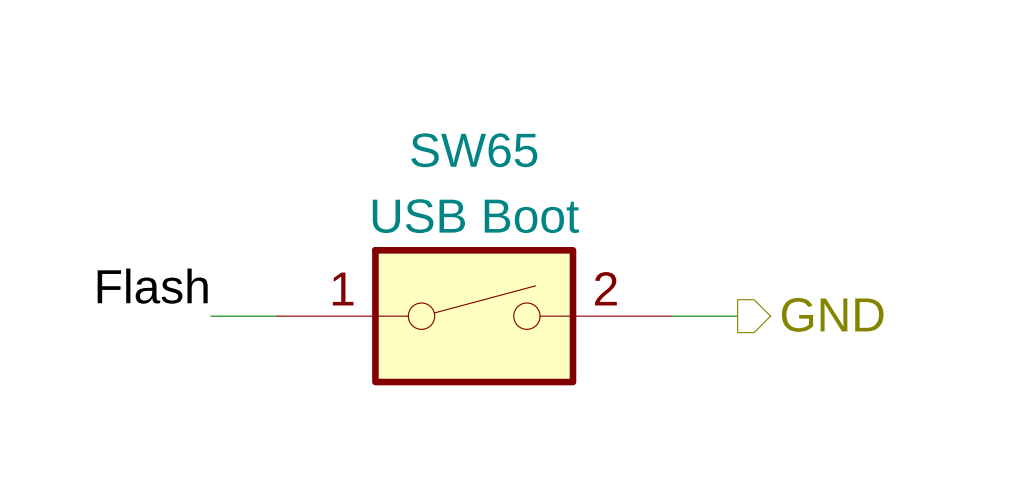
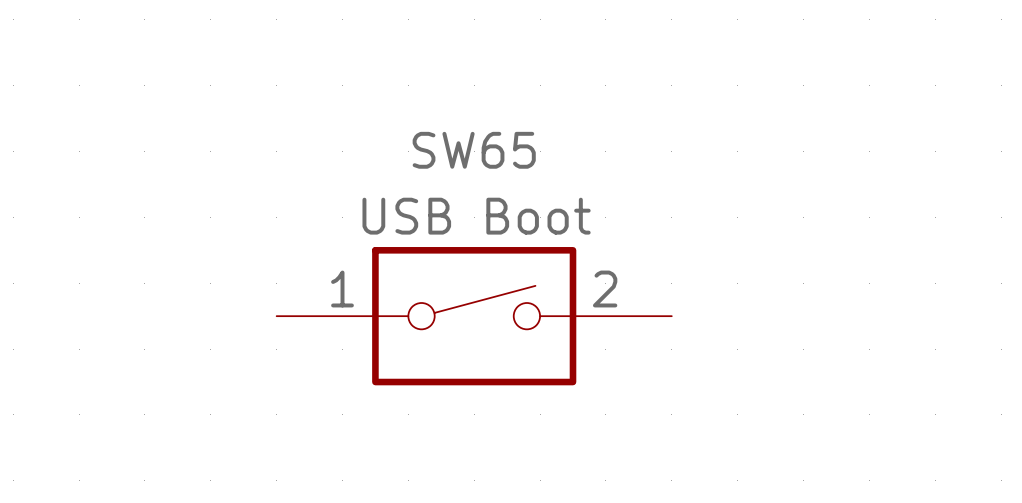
label: Flash (152, 286) -> none
hierarchical label: GND (832, 314) -> none
wire: (210, 316) (276, 316) -> none
wire: (671, 316) (737, 316) -> none

